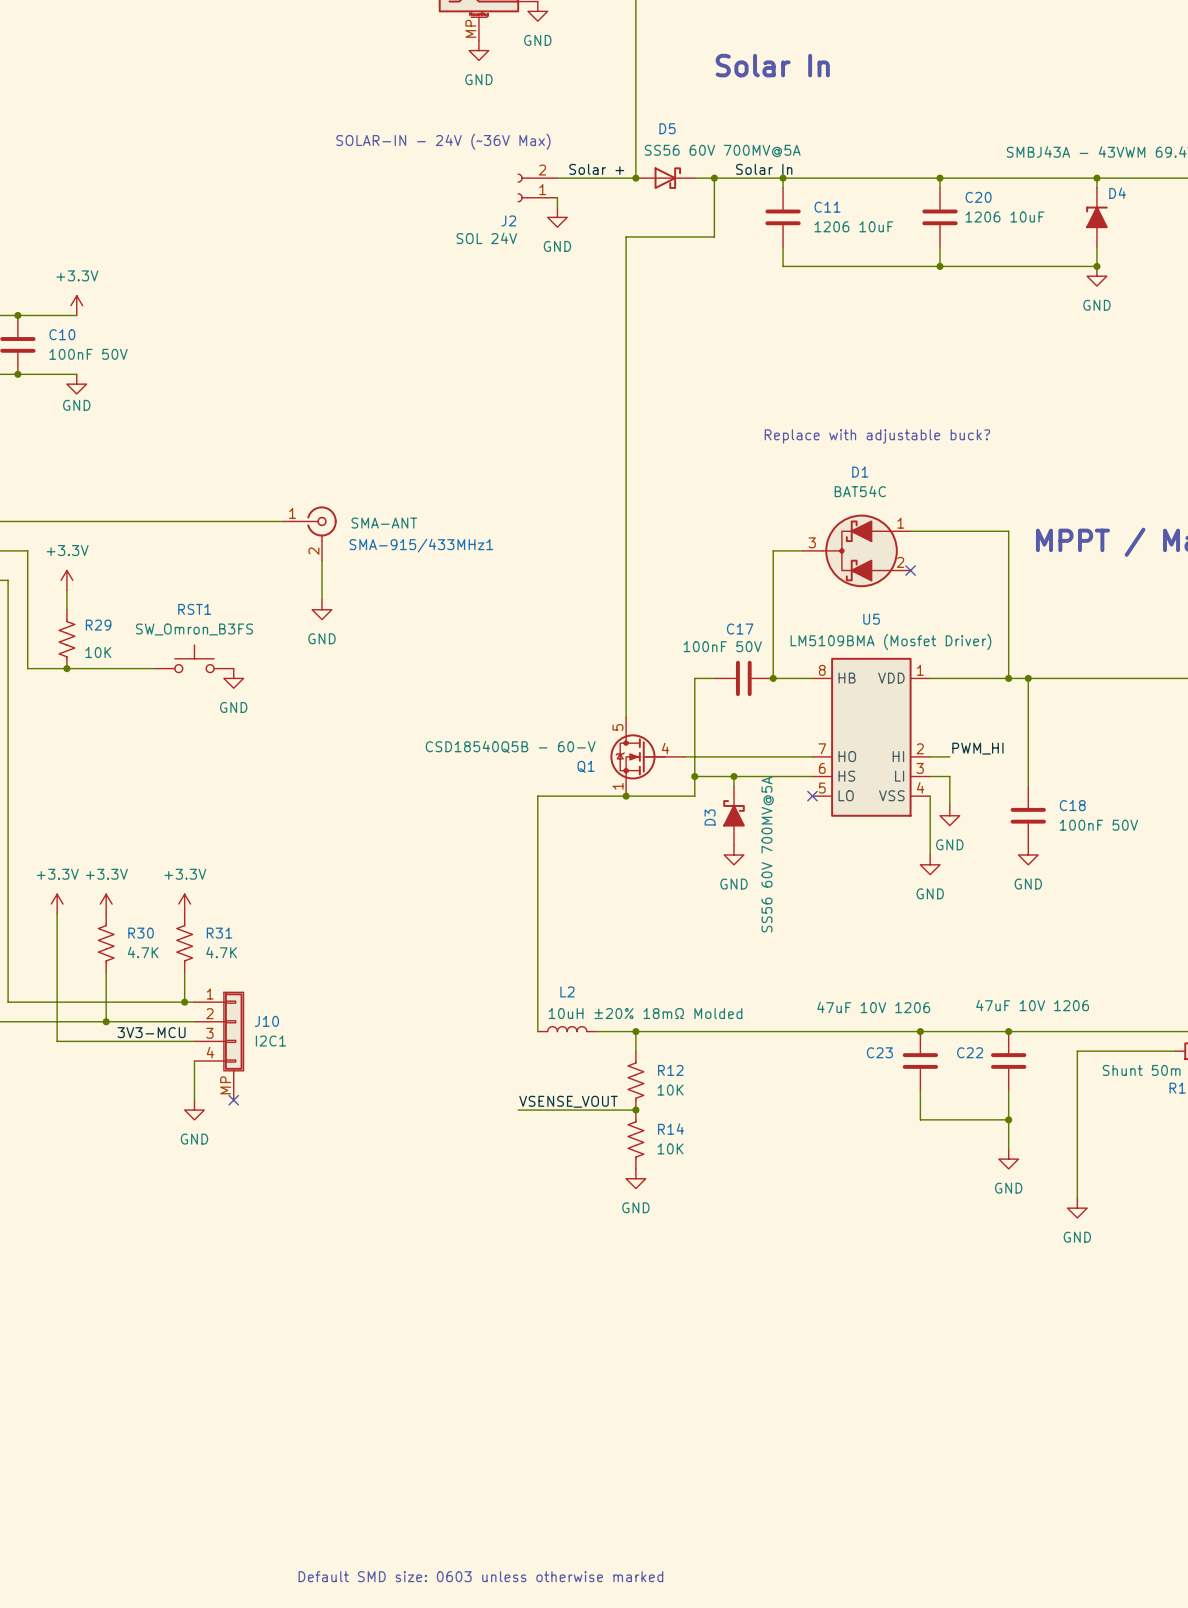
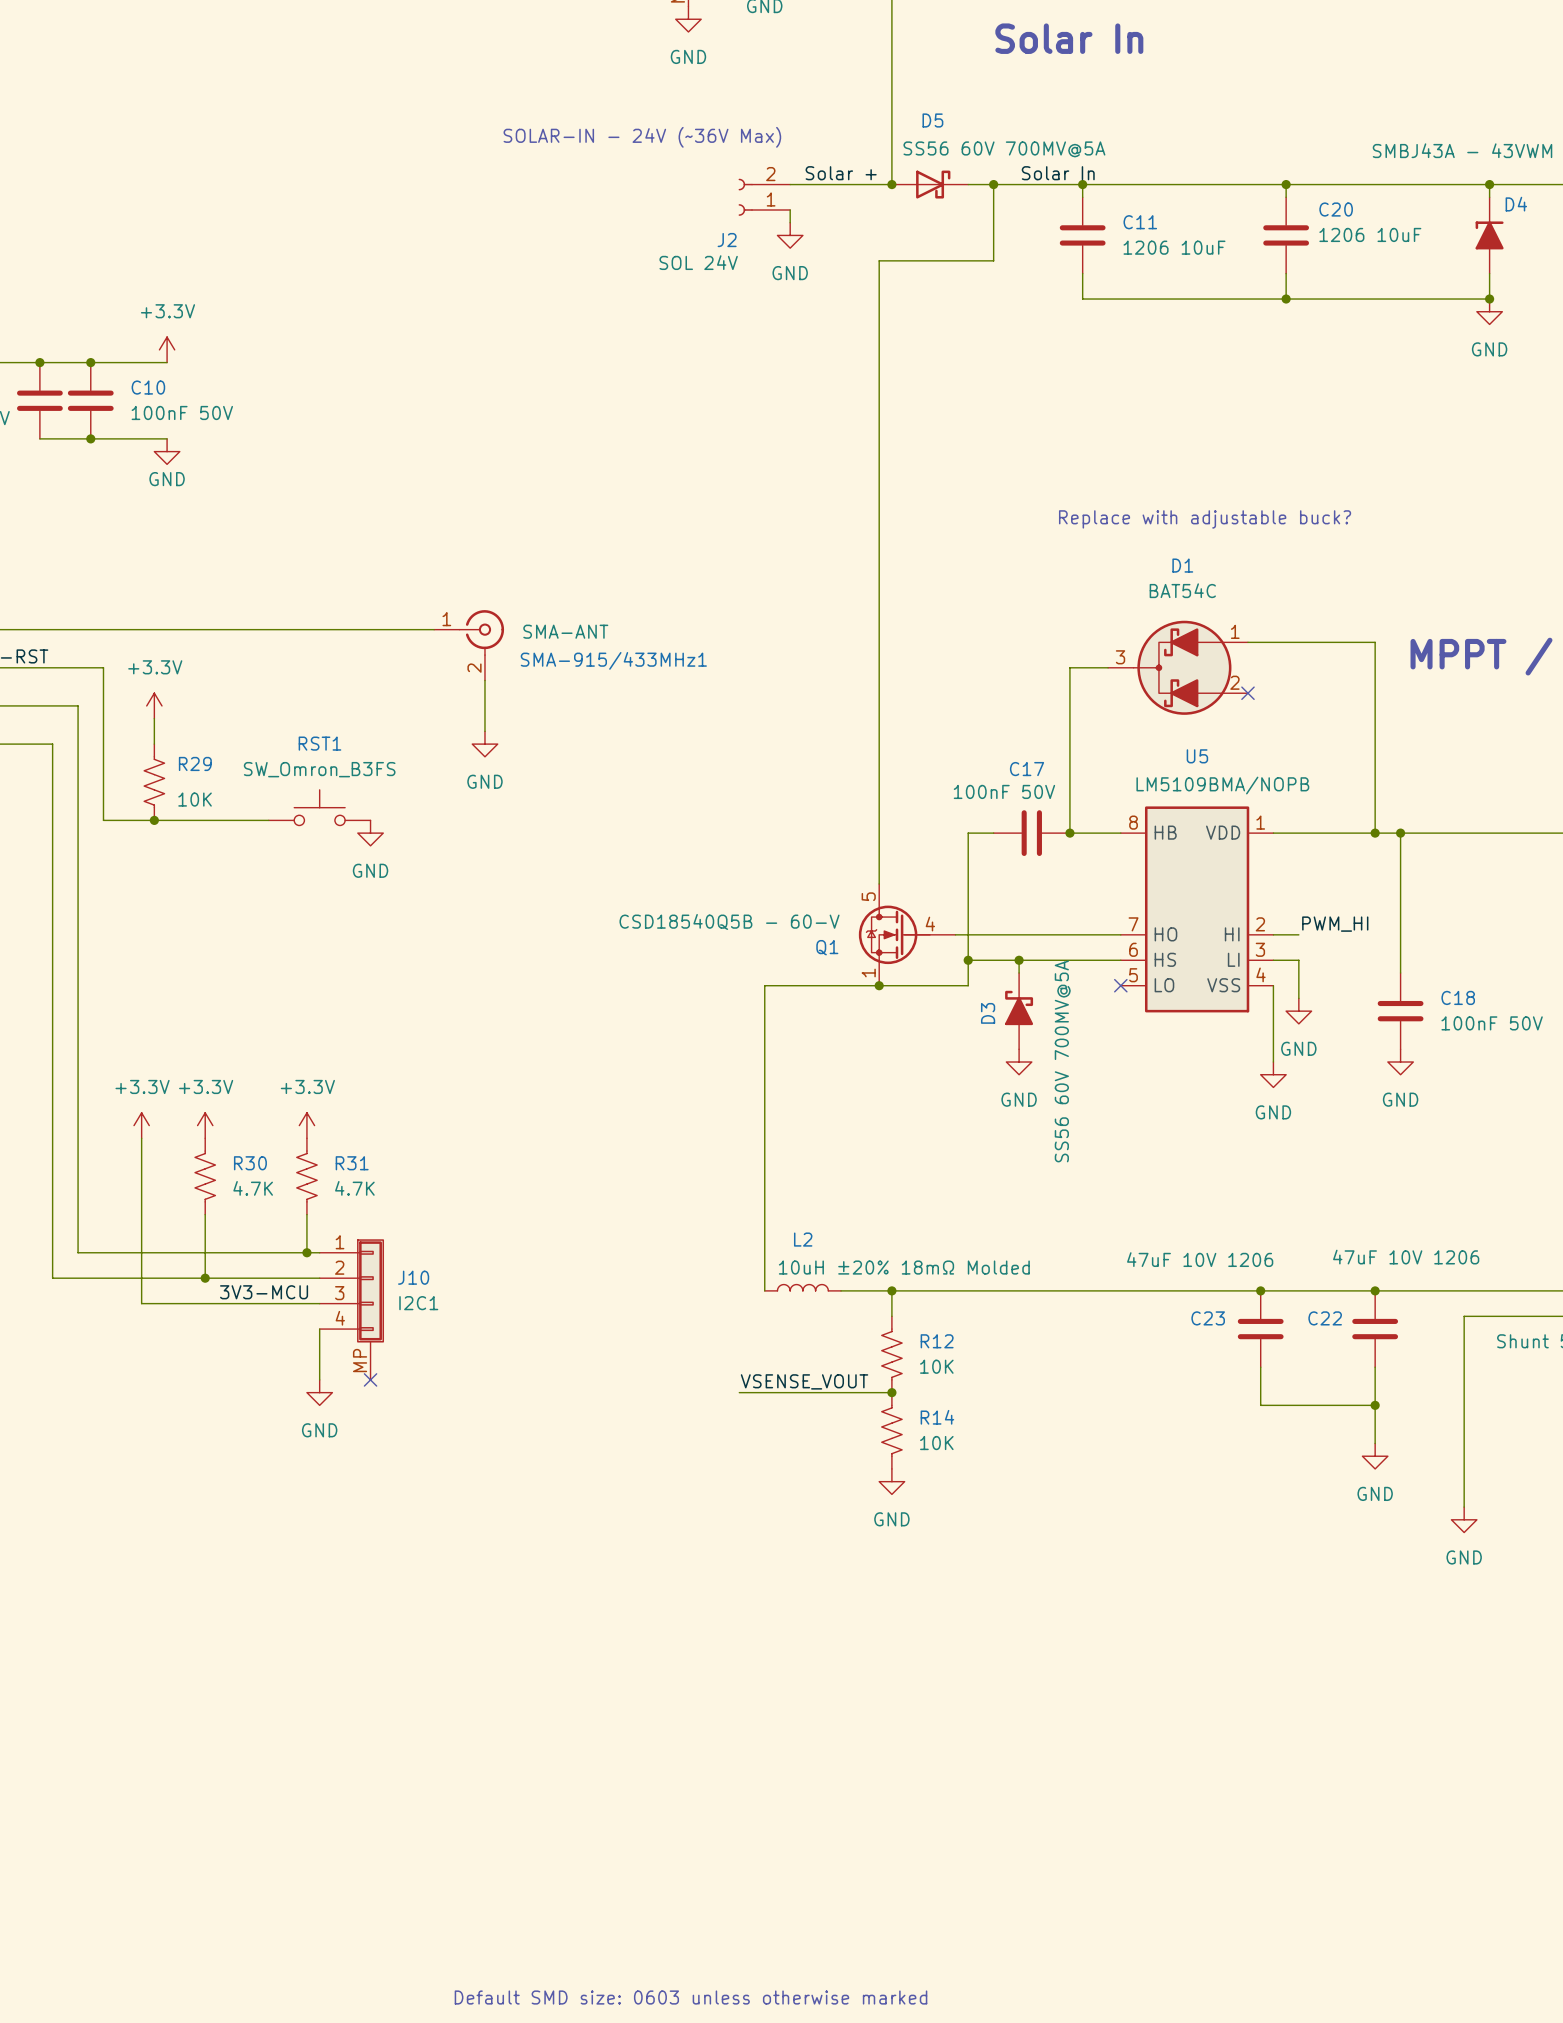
U5 value: LM5109BMA (Mosfet Driver) (890, 641) -> LM5109BMA/NOPB (1222, 785)

